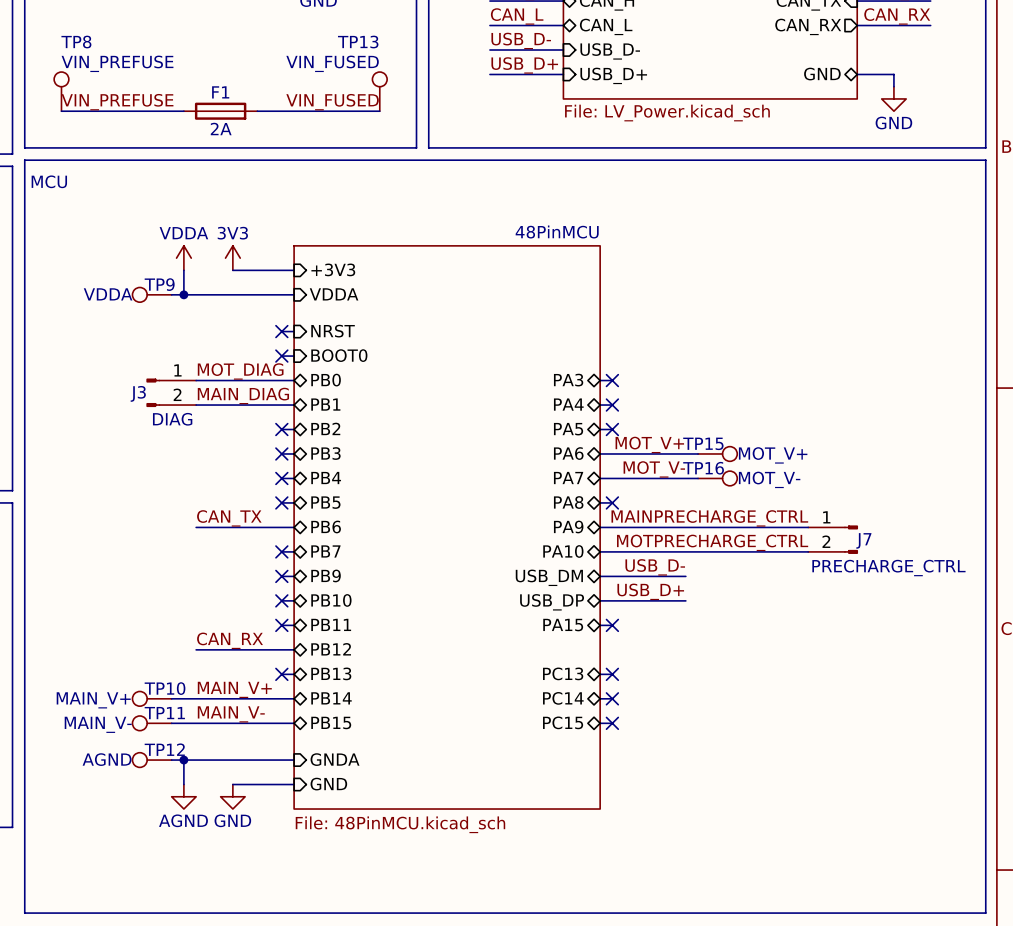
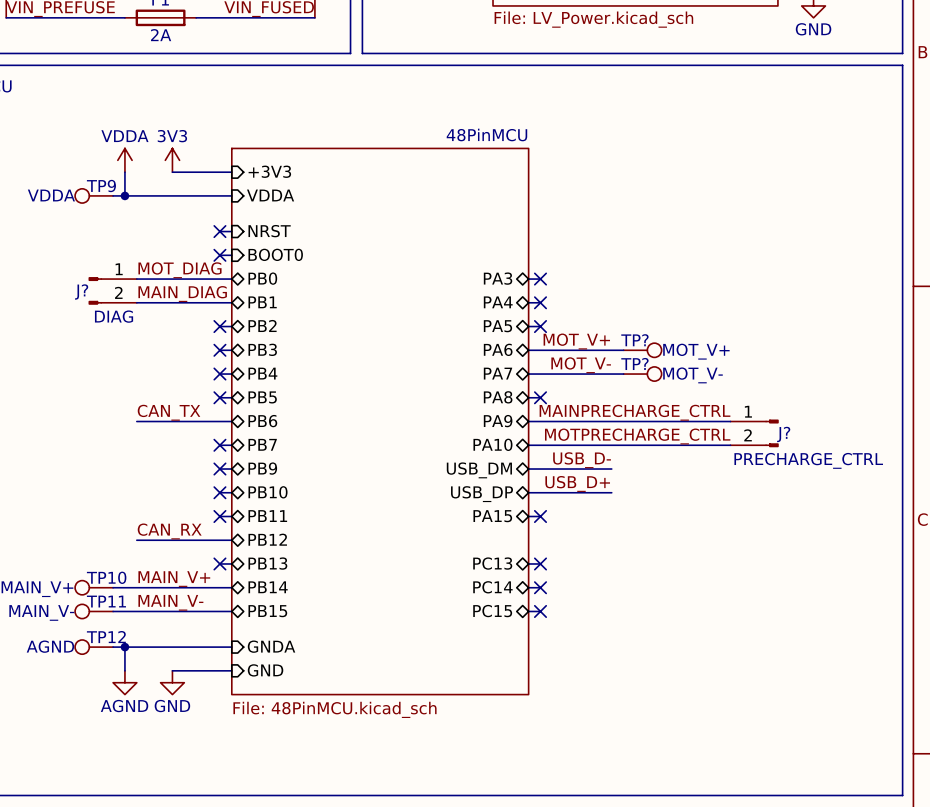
J3 name: J3 (138, 393) -> J? (81, 292)
TP15 name: TP15 (703, 443) -> TP? (634, 340)
TP16 name: TP16 (703, 468) -> TP? (634, 363)
J7 name: J7 (863, 540) -> J? (783, 434)

